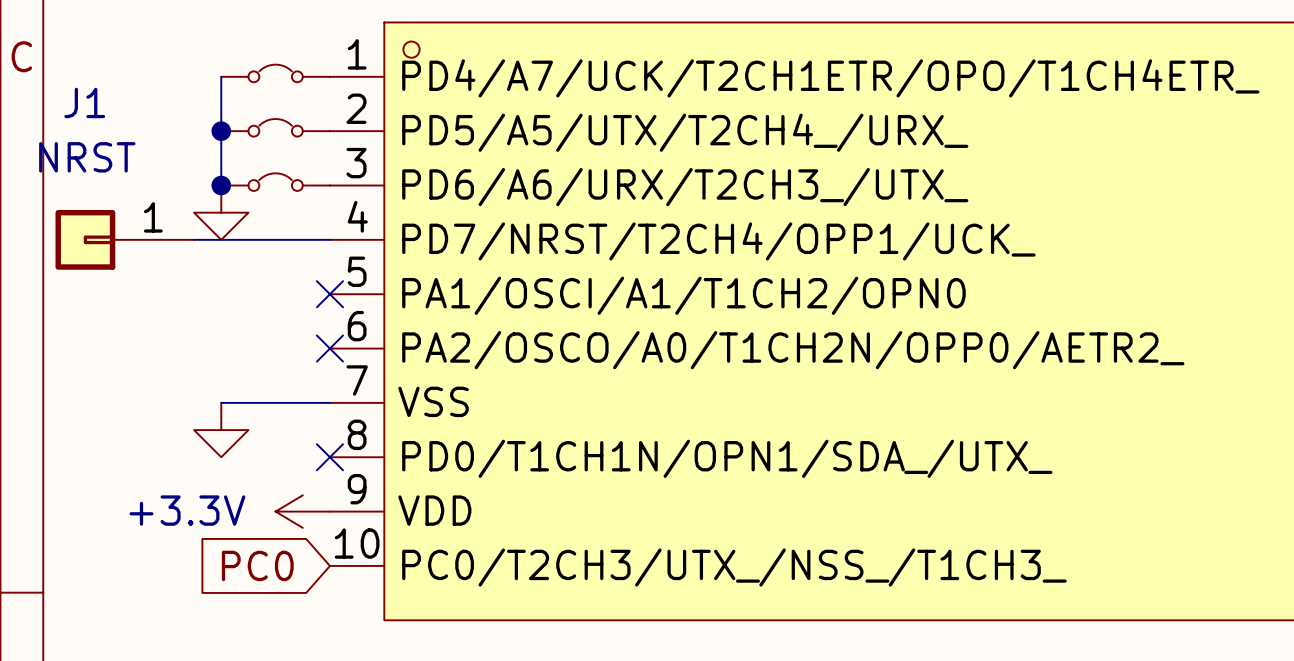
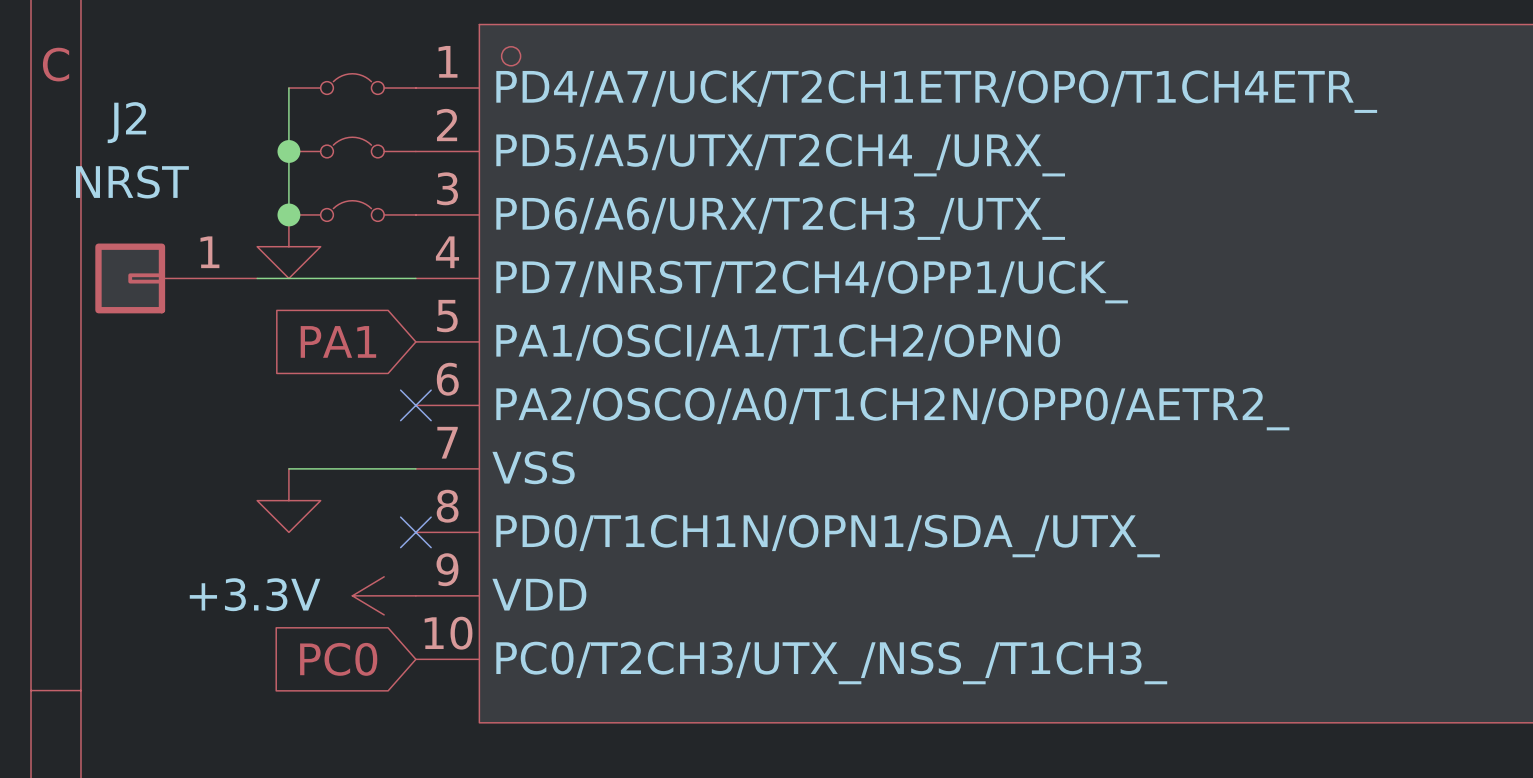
J1 name: J1 (84, 102) -> J2 (126, 122)
global label: none -> PA1 (338, 341)
no-connect mark: (329, 294) -> none

